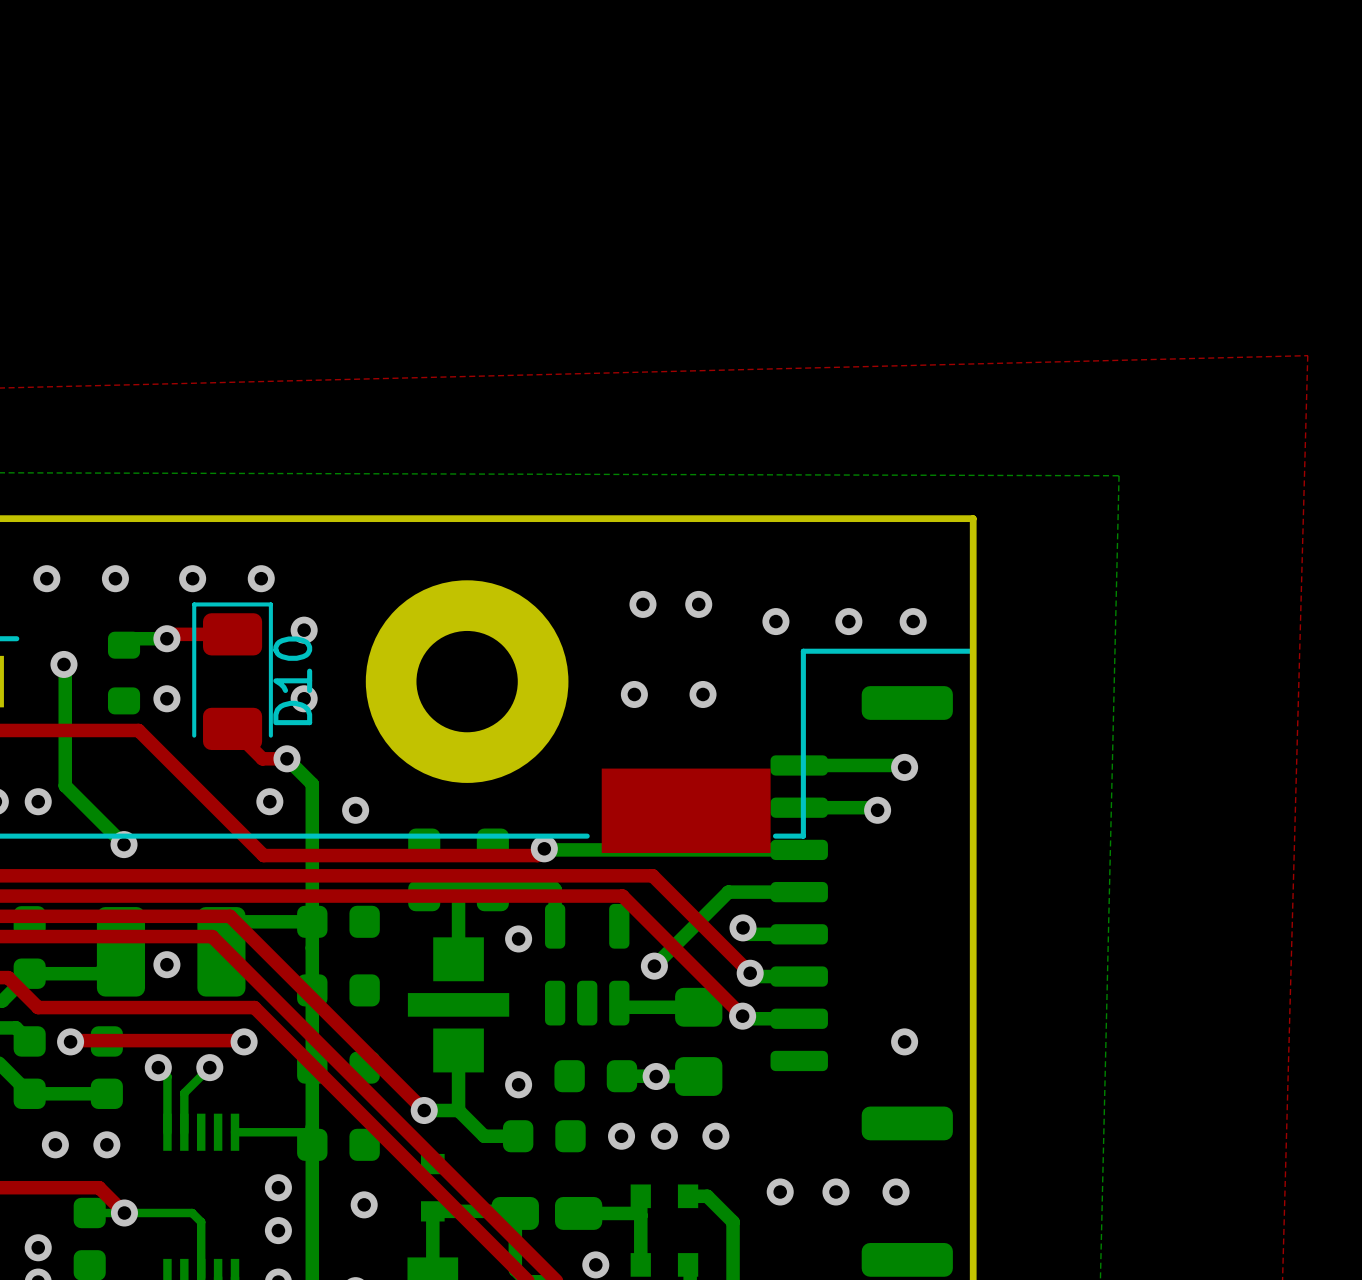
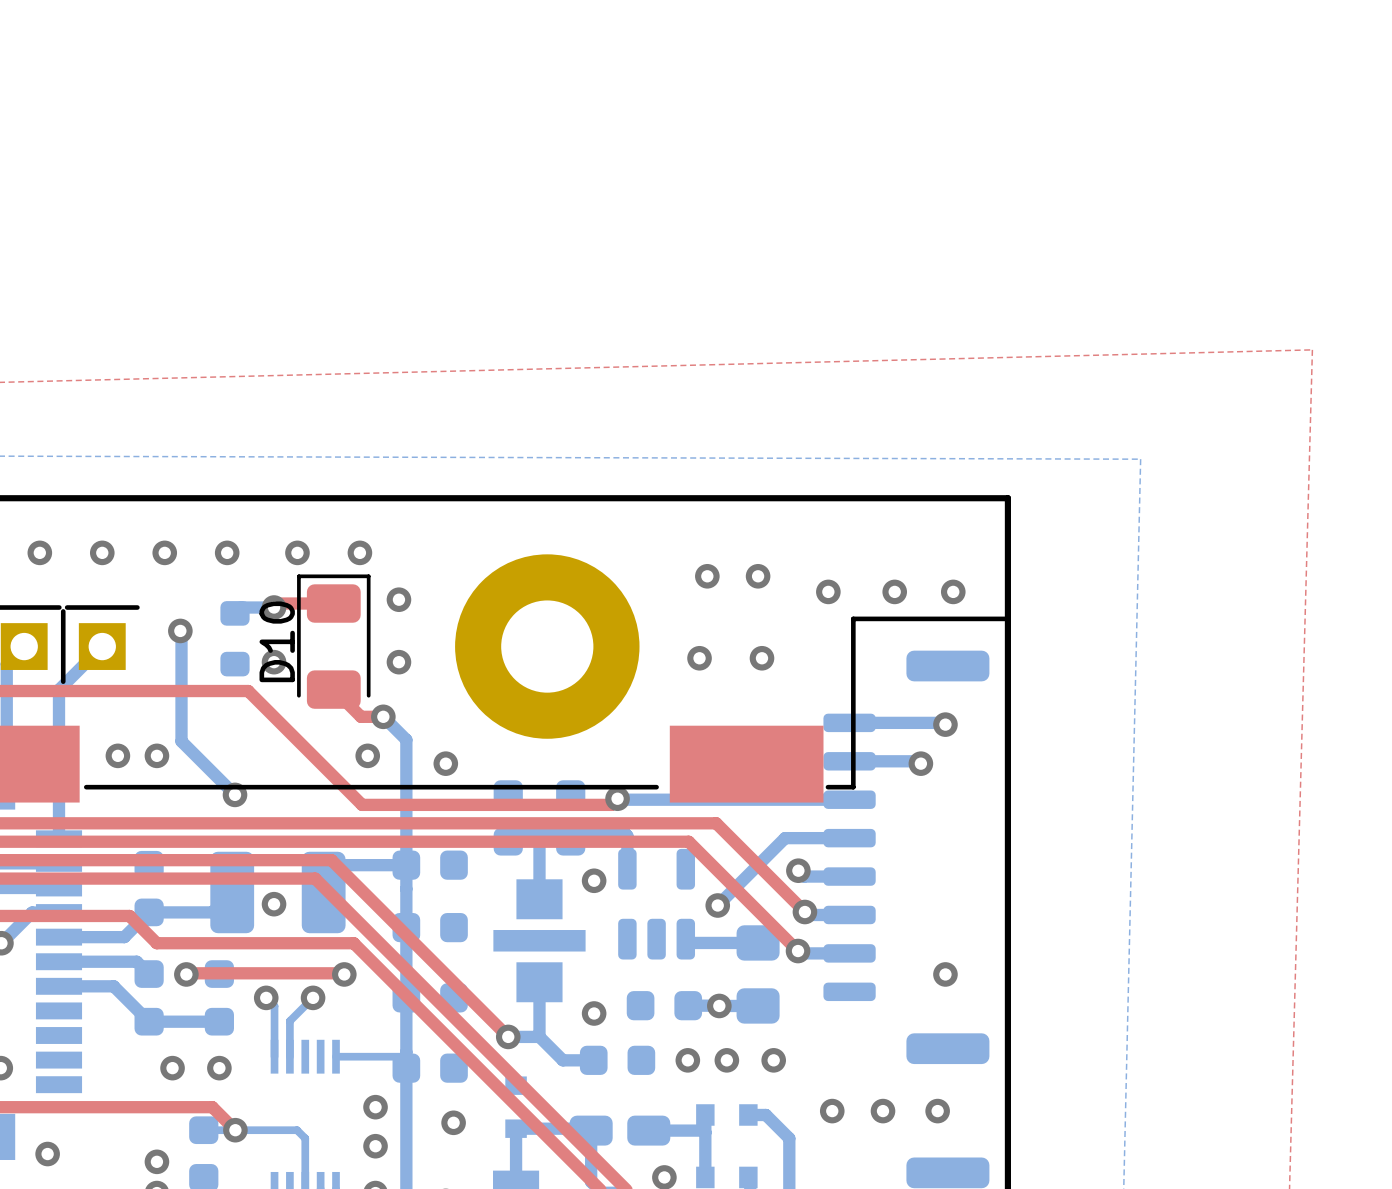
D10 name position: D10 (292, 680) -> D10 (277, 641)

